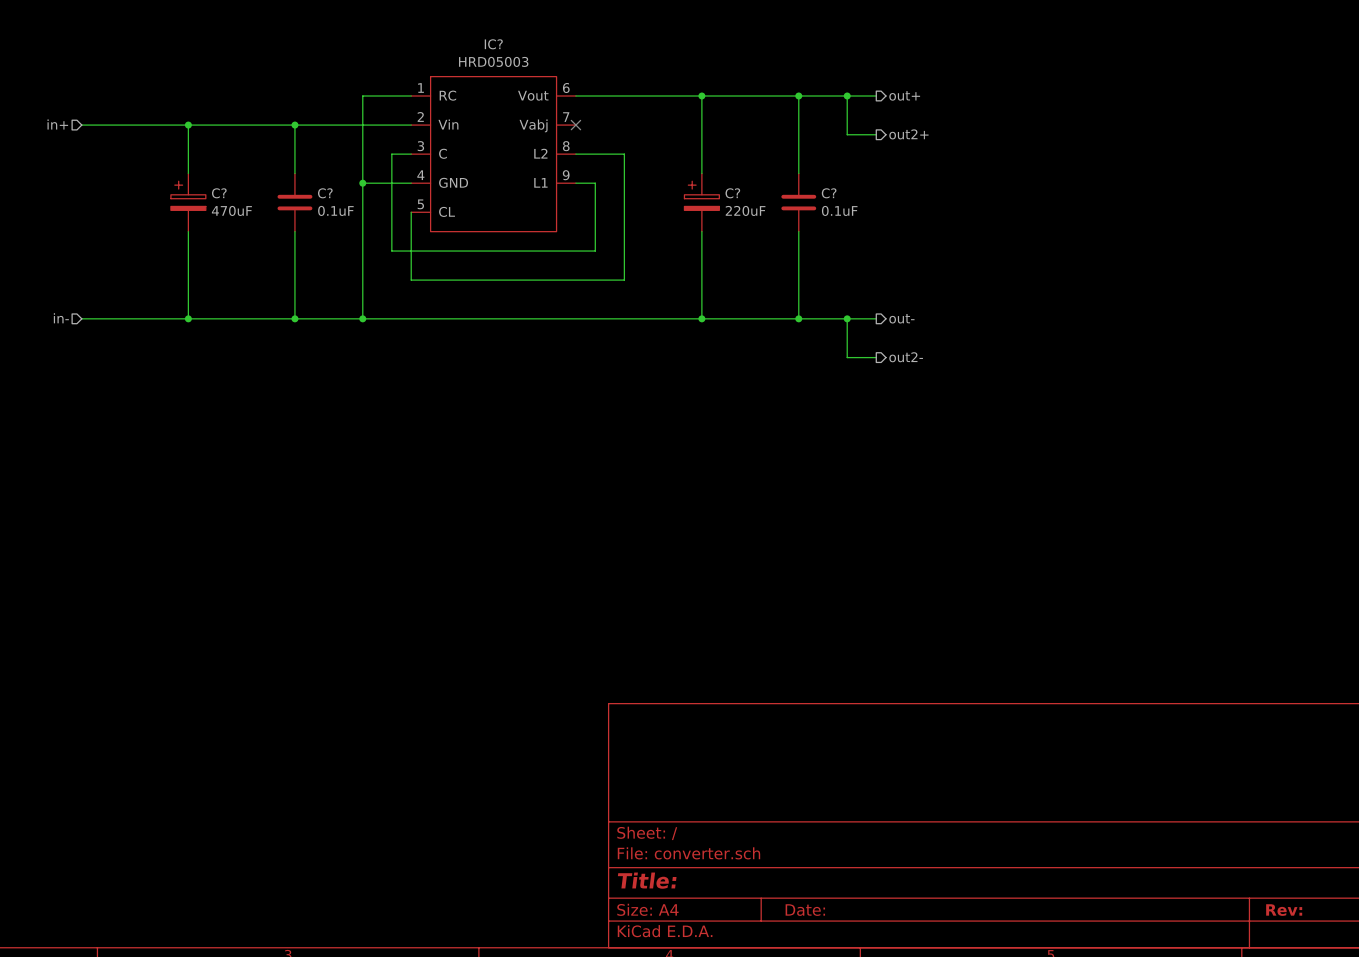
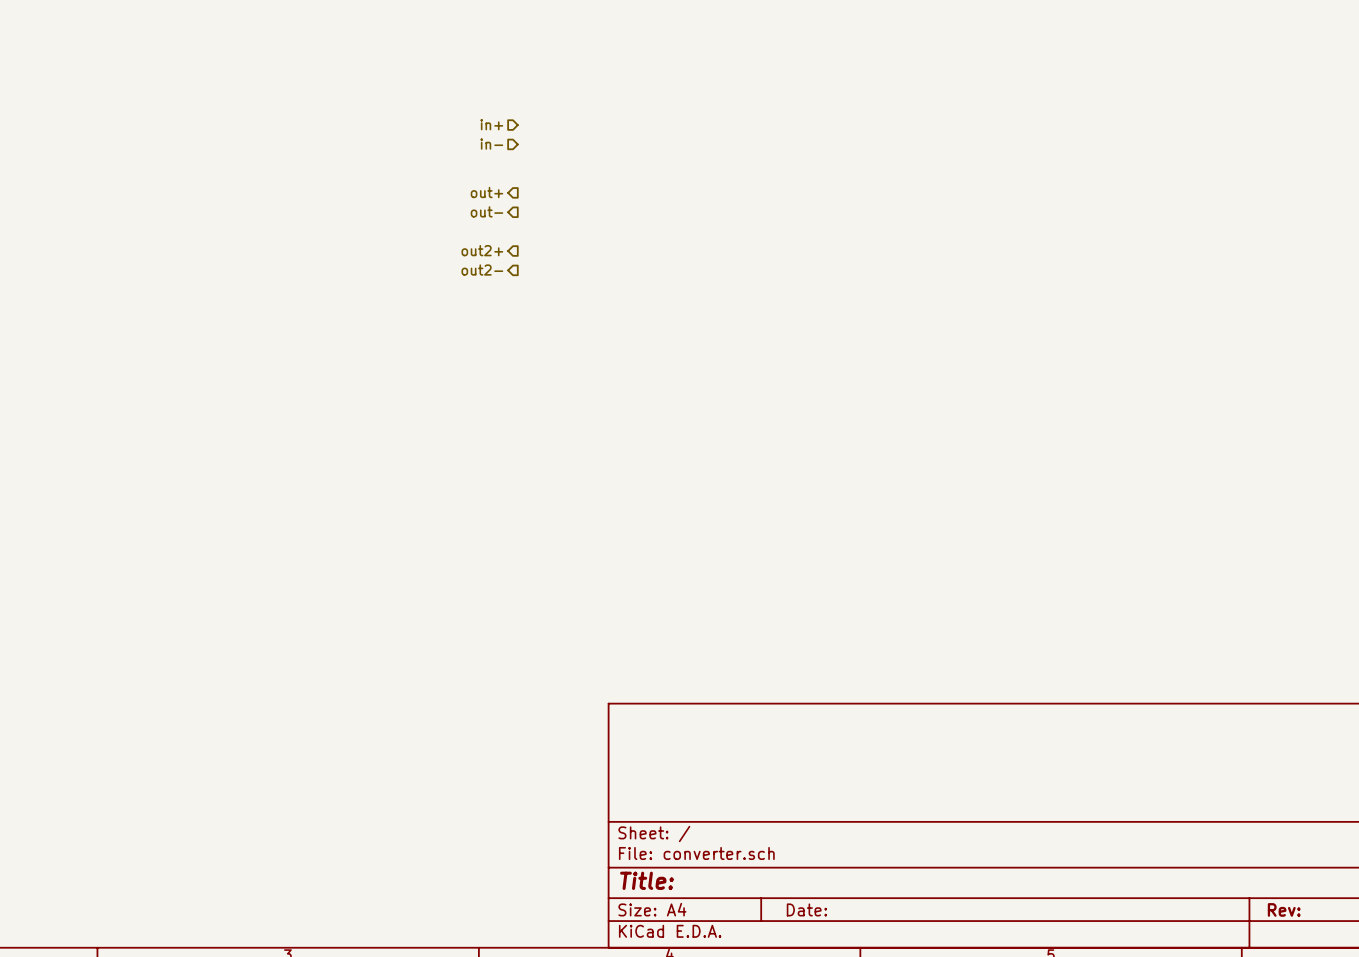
hierarchical label: out+ (904, 95) -> none
wire: (411, 96) (362, 96) (362, 318) -> none
wire: (575, 96) (876, 96) -> none
wire: (701, 96) (701, 173) -> none
junction: (701, 96) -> none
wire: (798, 96) (798, 173) -> none
junction: (798, 96) -> none
wire: (847, 96) (847, 134) (876, 134) -> none
junction: (847, 96) -> none
hierarchical label: in+ (57, 124) -> none
hierarchical label: none -> in+ (491, 124)
wire: (81, 125) (411, 125) -> none
wire: (188, 125) (188, 173) -> none
junction: (188, 125) -> none
wire: (294, 125) (294, 173) -> none
junction: (294, 125) -> none
no-connect mark: (575, 125) -> none
hierarchical label: out2+ (908, 134) -> none
hierarchical label: none -> in- (491, 144)
wire: (411, 154) (391, 154) (391, 251) (595, 251) (595, 183) (575, 183) -> none
IC?: HRD05003 (493, 154) -> none
wire: (575, 154) (624, 154) (624, 280) (411, 280) (411, 212) -> none
wire: (362, 183) (411, 183) -> none
junction: (362, 183) -> none
hierarchical label: none -> out+ (486, 192)
C?: 470uF (188, 202) -> none
C?: 0.1uF (294, 202) -> none
C?: 220uF (701, 202) -> none
C?: 0.1uF (798, 202) -> none
hierarchical label: none -> out- (486, 211)
wire: (188, 231) (188, 318) -> none
wire: (294, 231) (294, 318) -> none
wire: (701, 231) (701, 318) -> none
wire: (798, 231) (798, 318) -> none
hierarchical label: none -> out2+ (482, 250)
hierarchical label: none -> out2- (482, 270)
hierarchical label: in- (61, 318) -> none
wire: (81, 318) (876, 318) -> none
junction: (188, 318) -> none
junction: (294, 318) -> none
junction: (362, 318) -> none
junction: (701, 318) -> none
junction: (798, 318) -> none
wire: (847, 318) (847, 357) (876, 357) -> none
junction: (847, 318) -> none
hierarchical label: out- (901, 318) -> none
hierarchical label: out2- (906, 357) -> none

